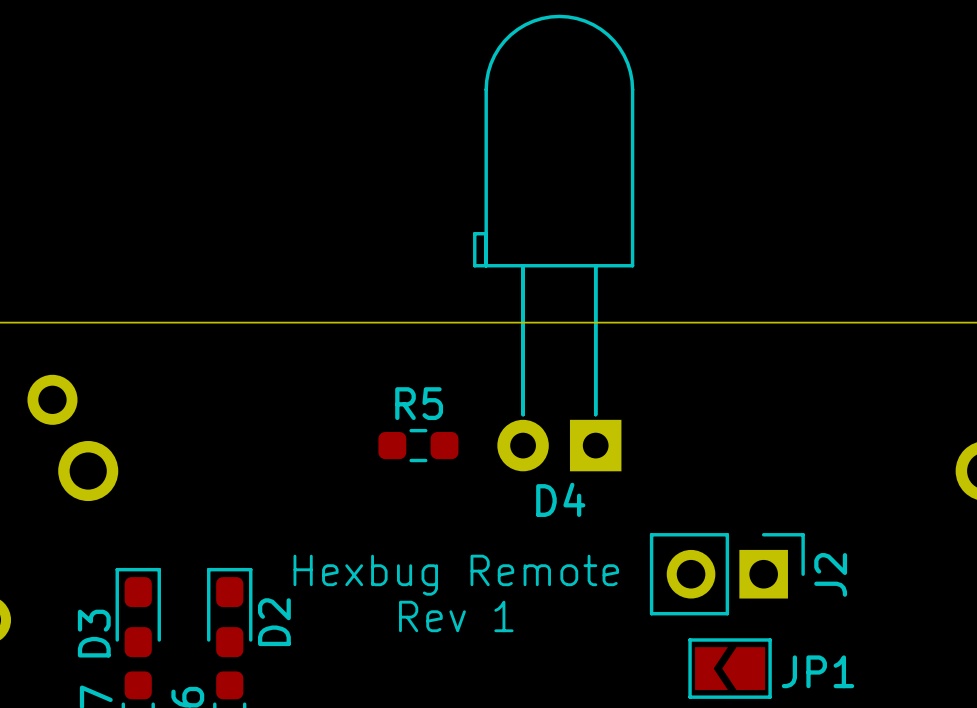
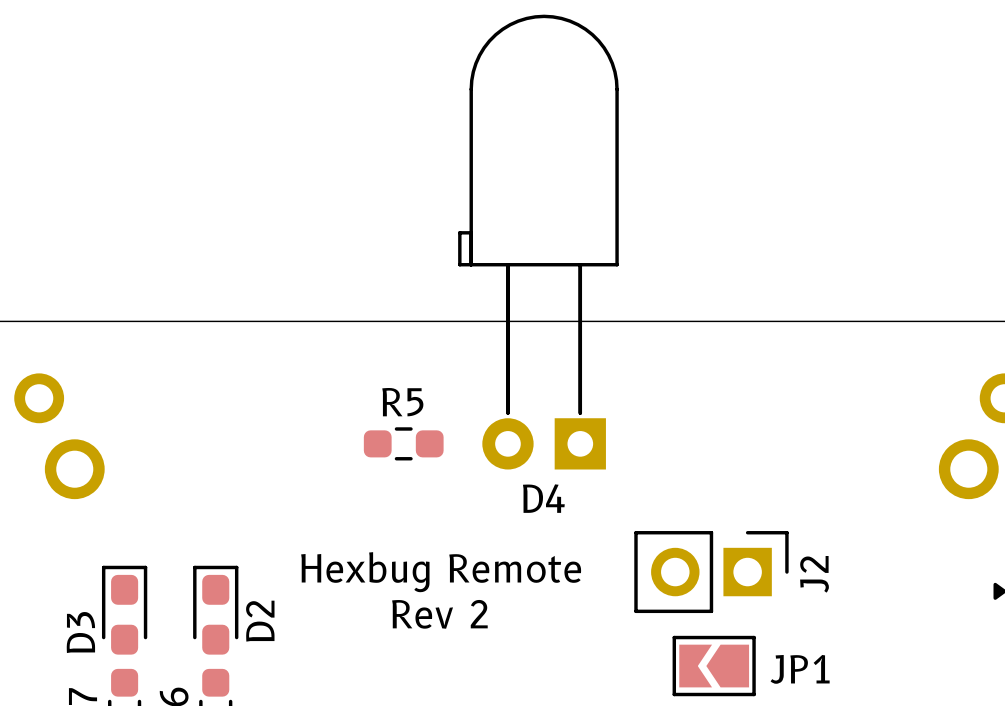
text: Rev 1 (456, 616) -> Rev 2 (439, 614)

